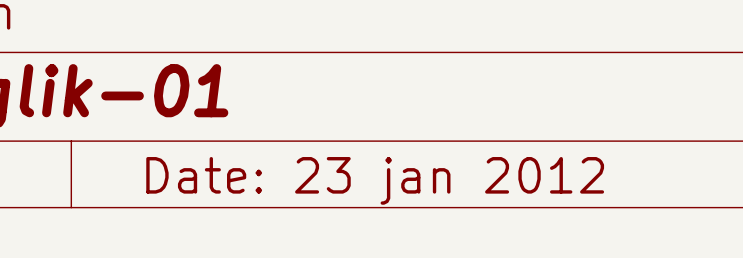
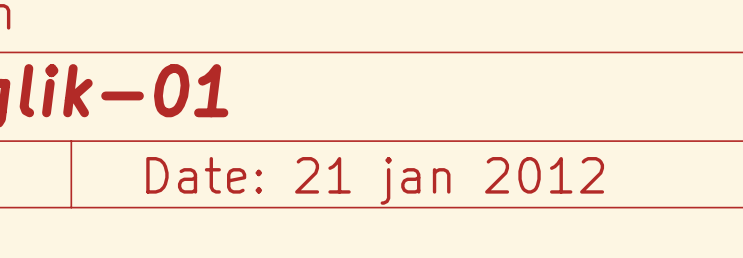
title block: Date: 23 jan 2012 (375, 180) -> Date: 21 jan 2012 (375, 180)

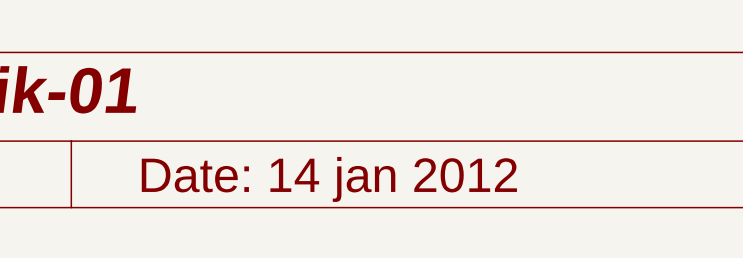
title block: Date: 21 jan 2012 (375, 180) -> Date: 14 jan 2012 (329, 179)

